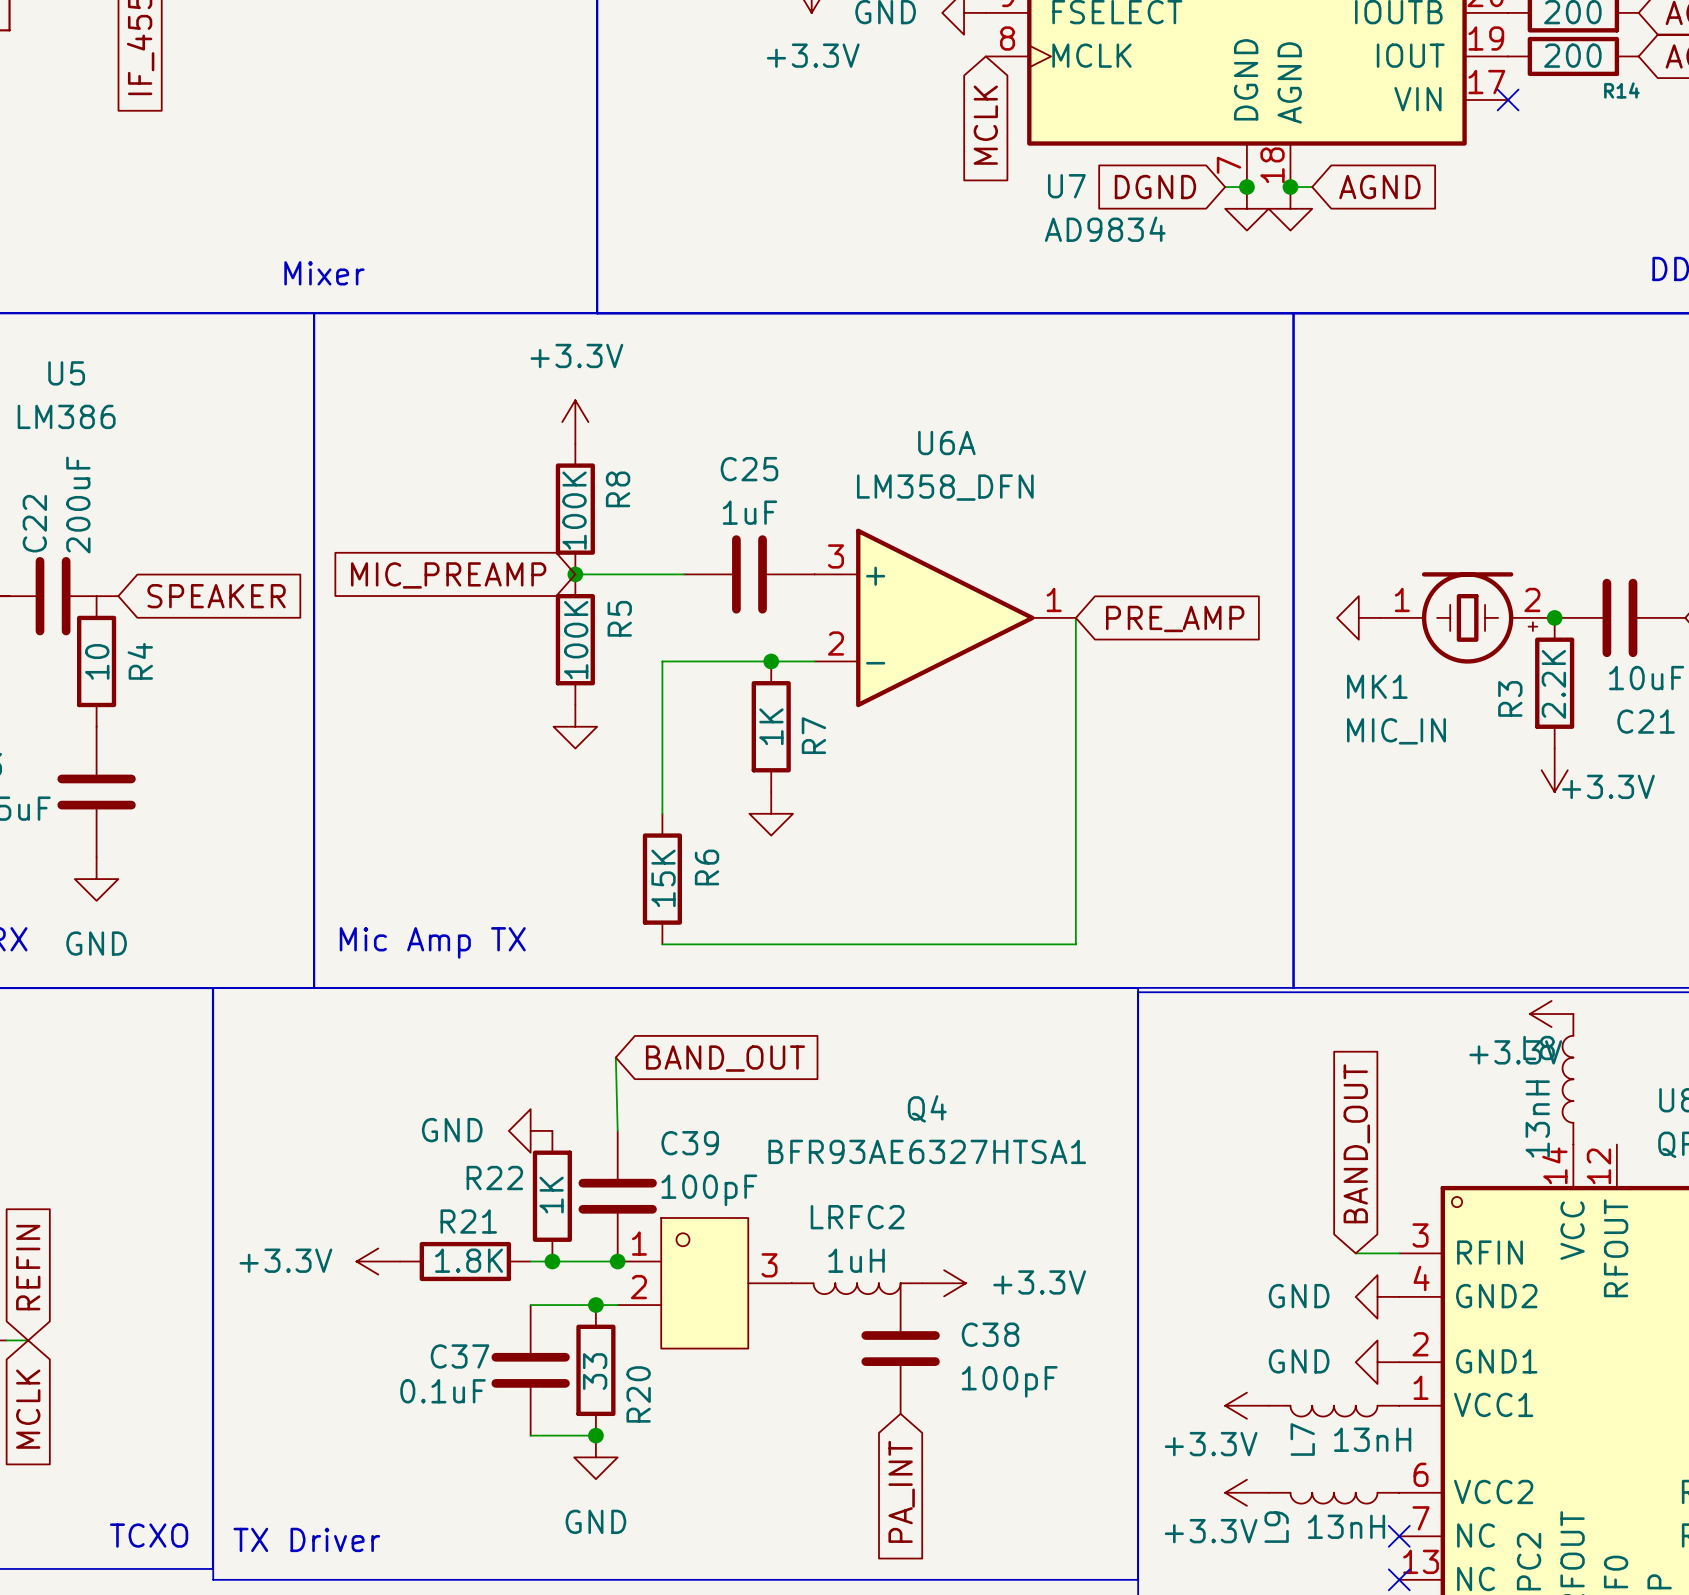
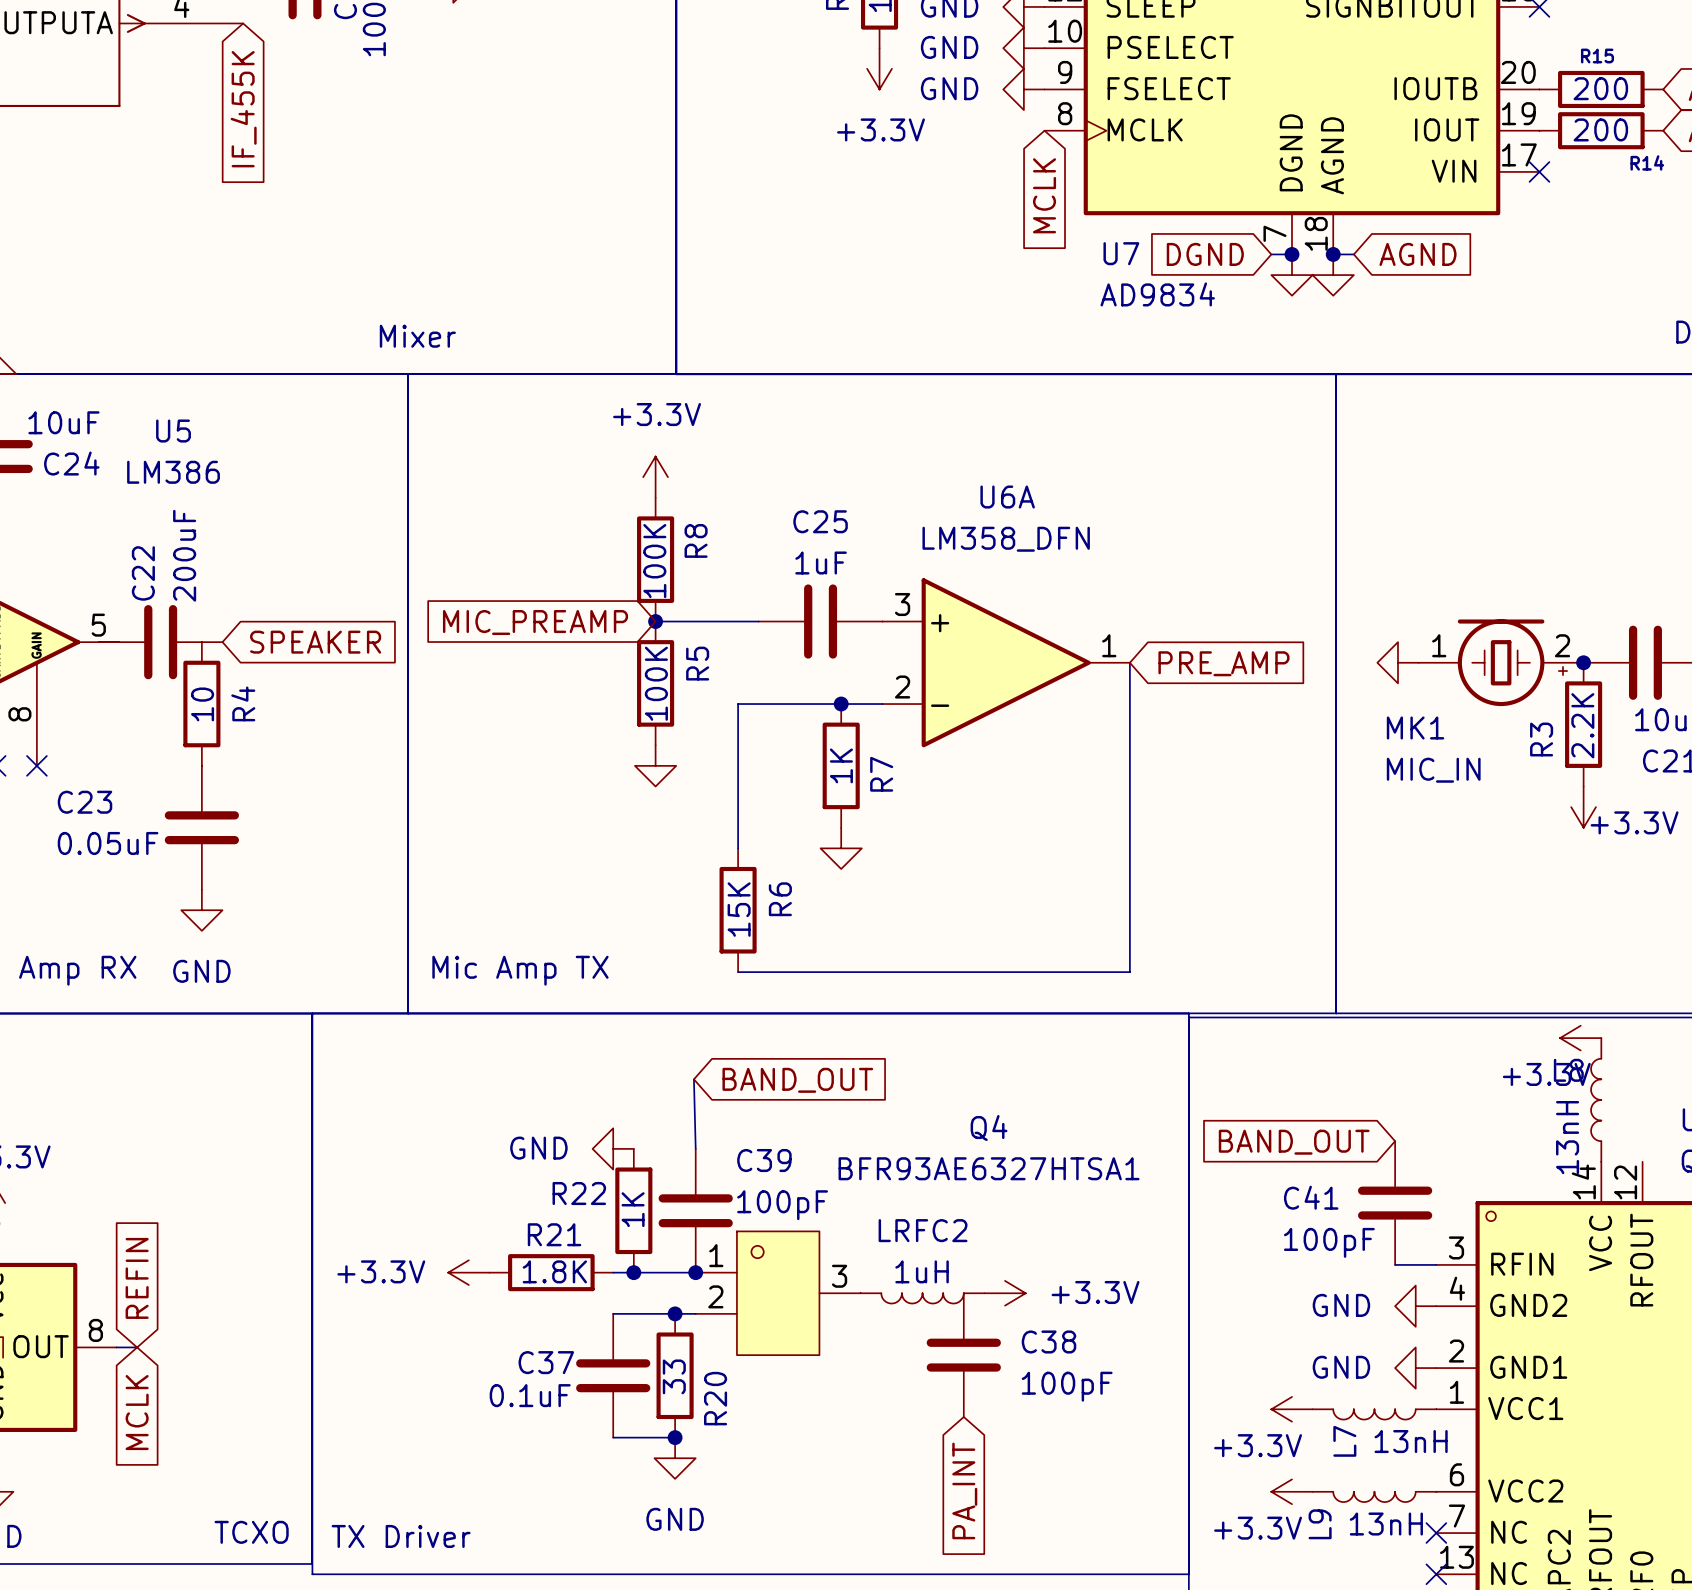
global label rotation: 0° (1356, 1143) -> 90° counterclockwise (1294, 1142)
C41: none -> 100pF (1395, 1203)

